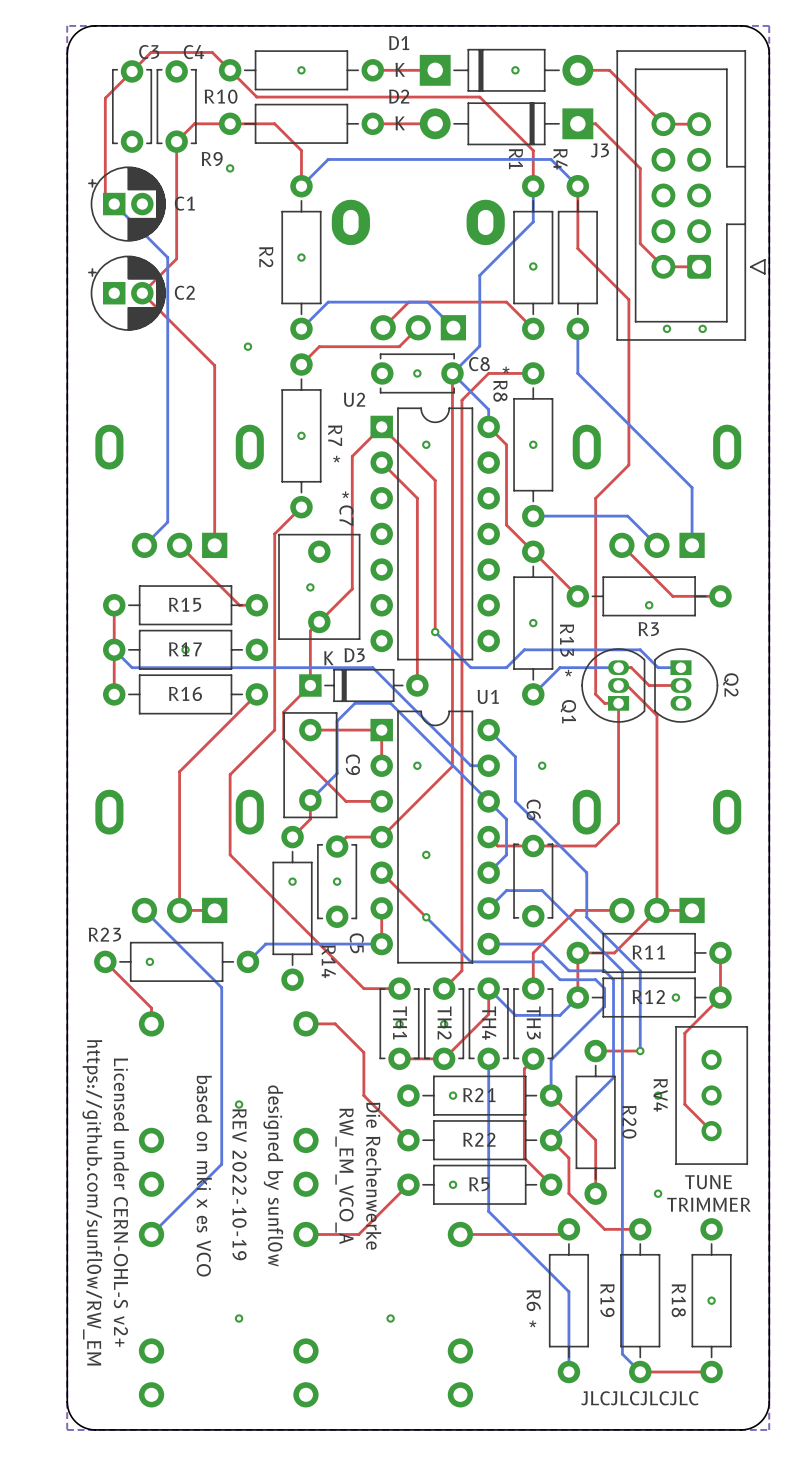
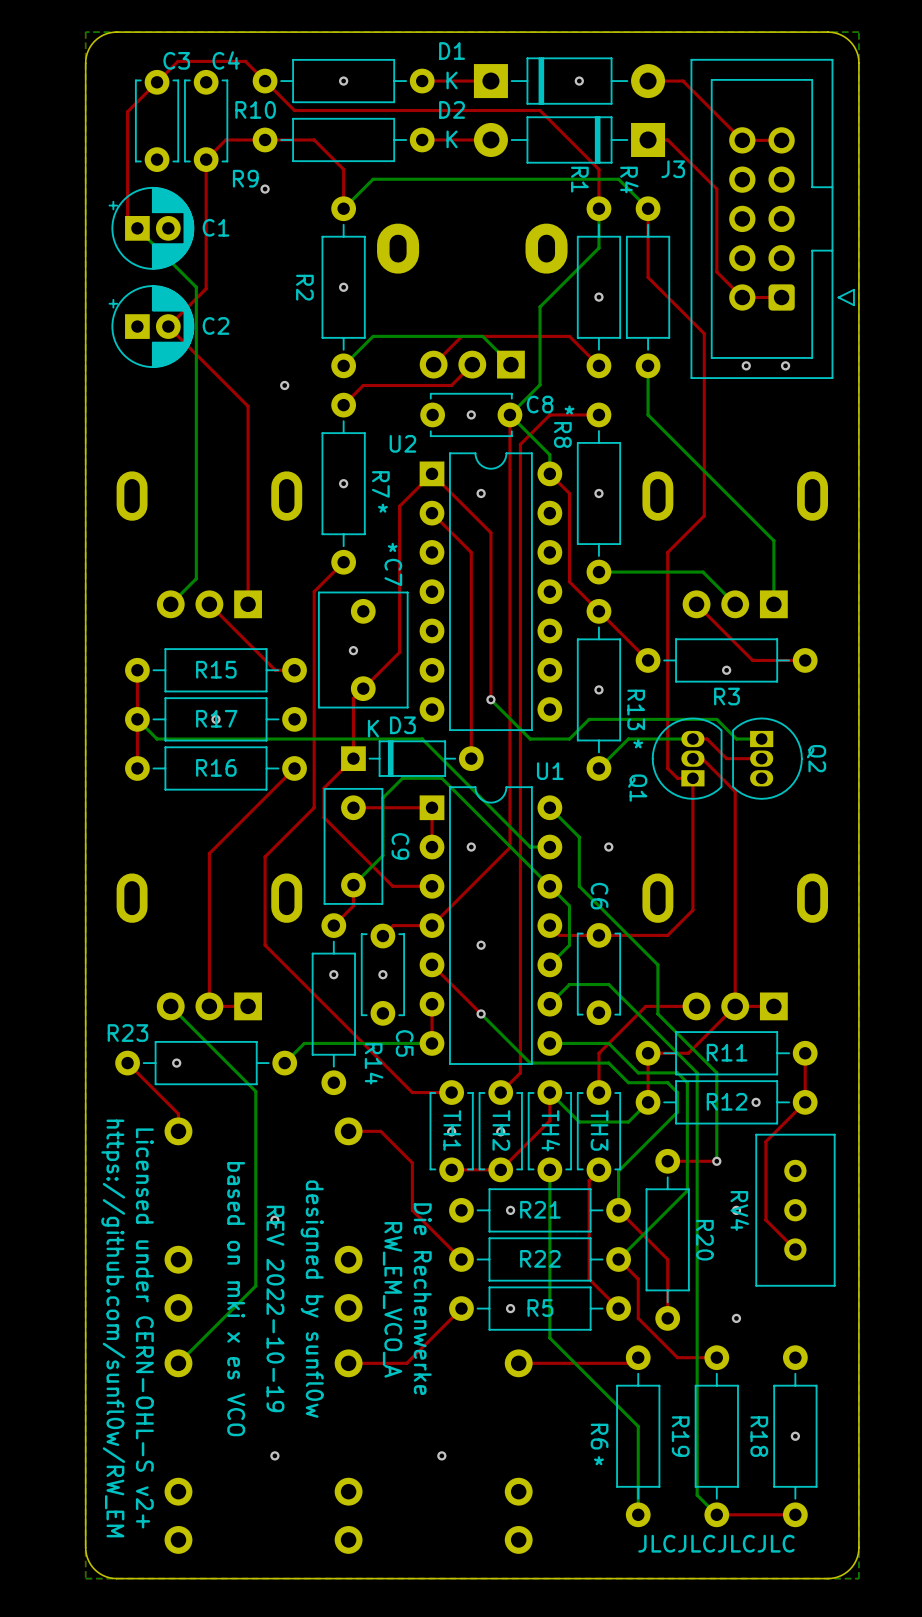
text: TUNE (708, 1182) -> none
text: TRIMMER (708, 1204) -> none

